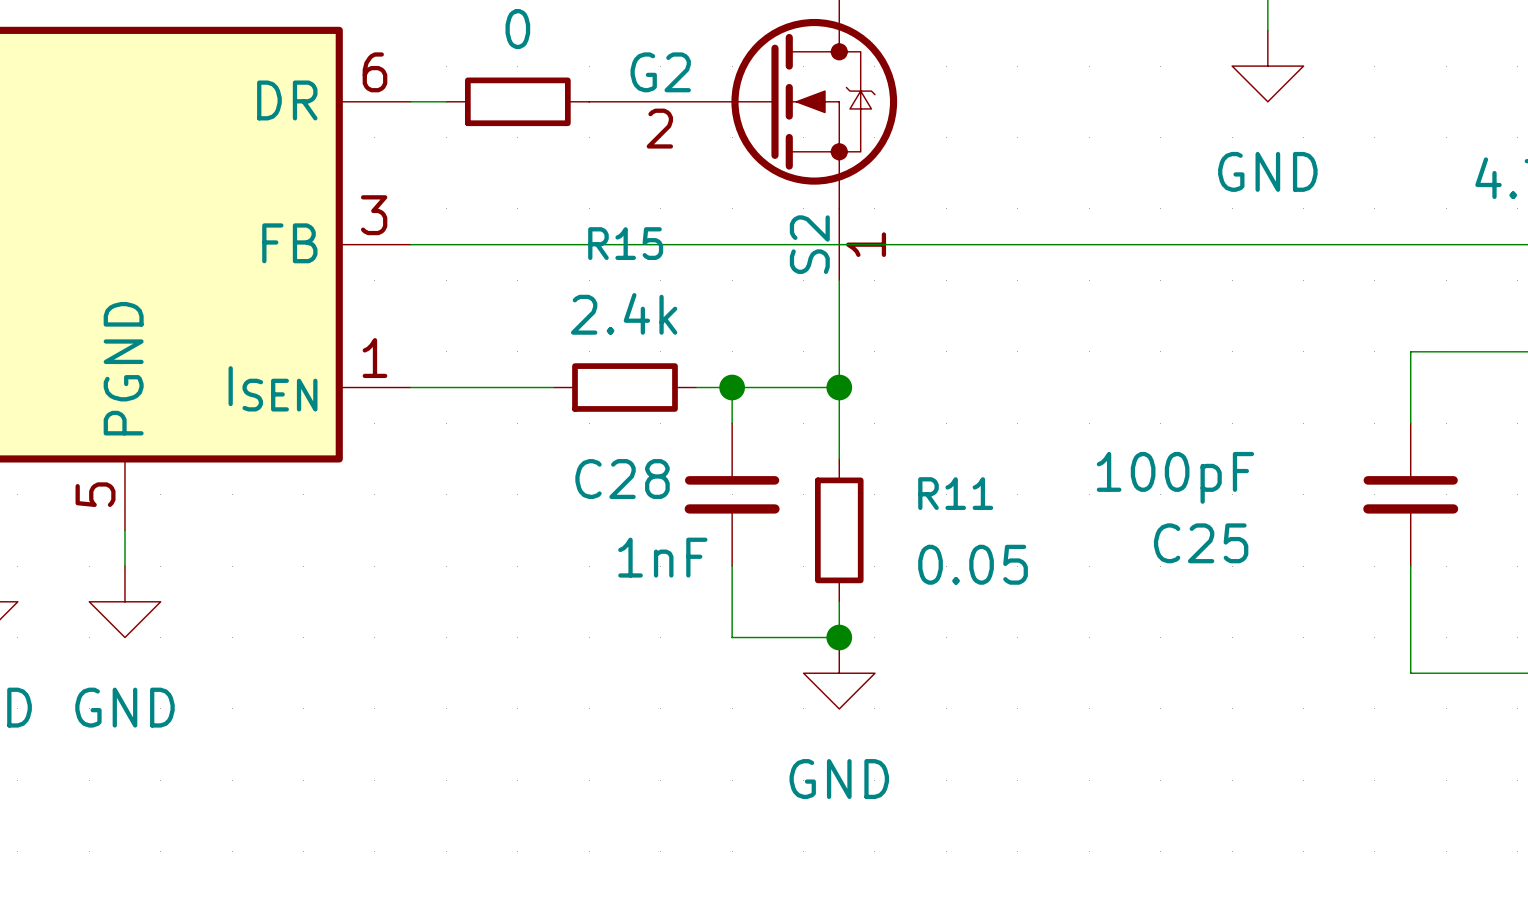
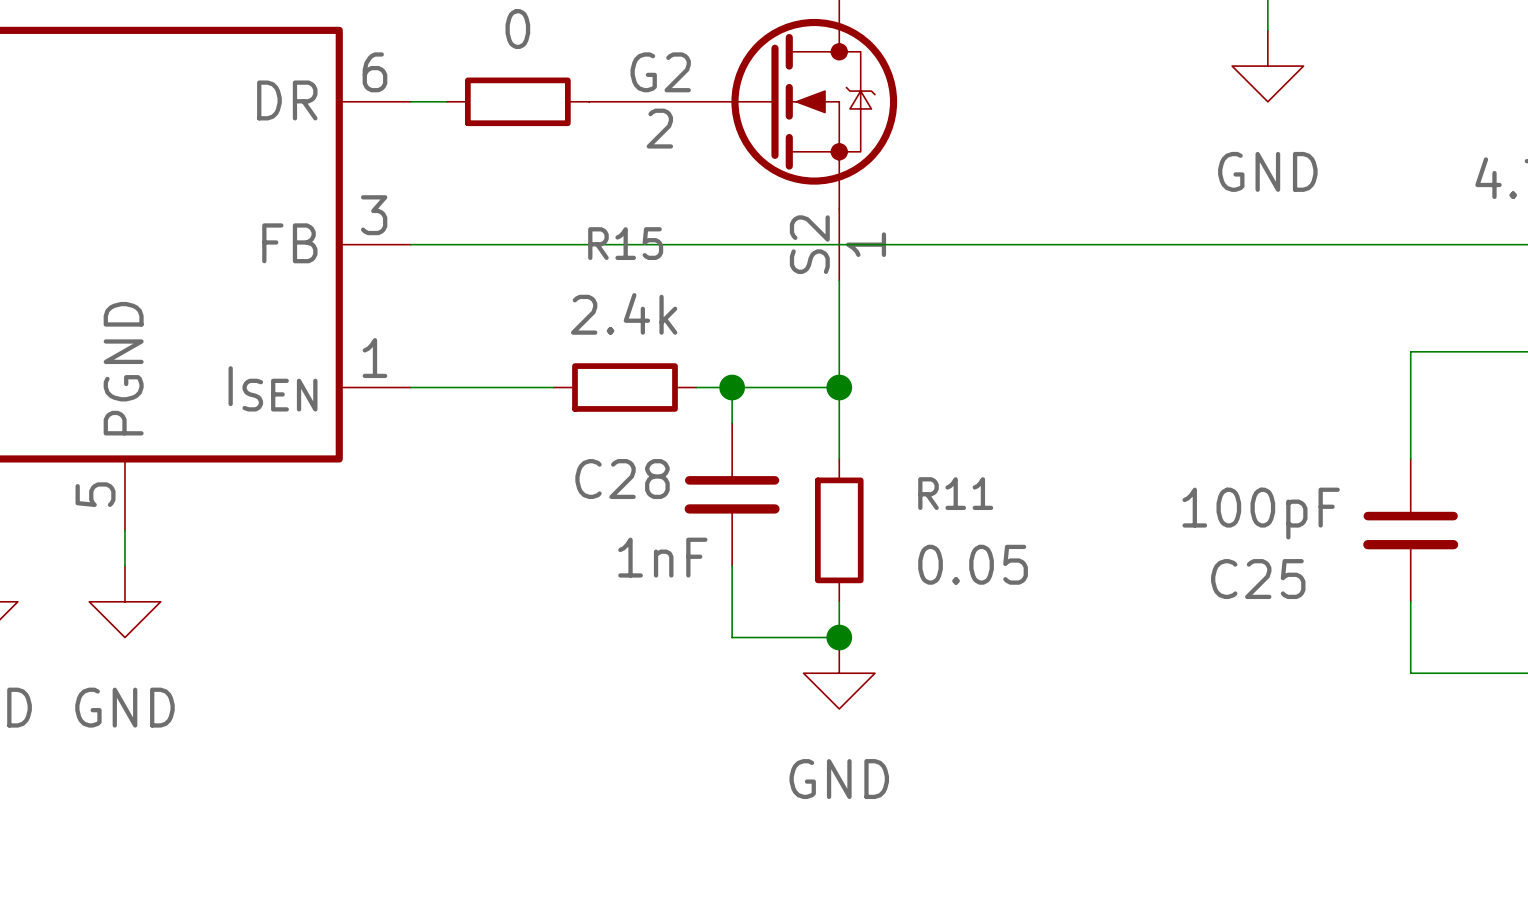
C25 value position: 100pF (1175, 477) -> 100pF (1261, 513)
C25 position: (1410, 494) -> (1410, 530)
C25 name position: C25 (1201, 543) -> C25 (1258, 579)

